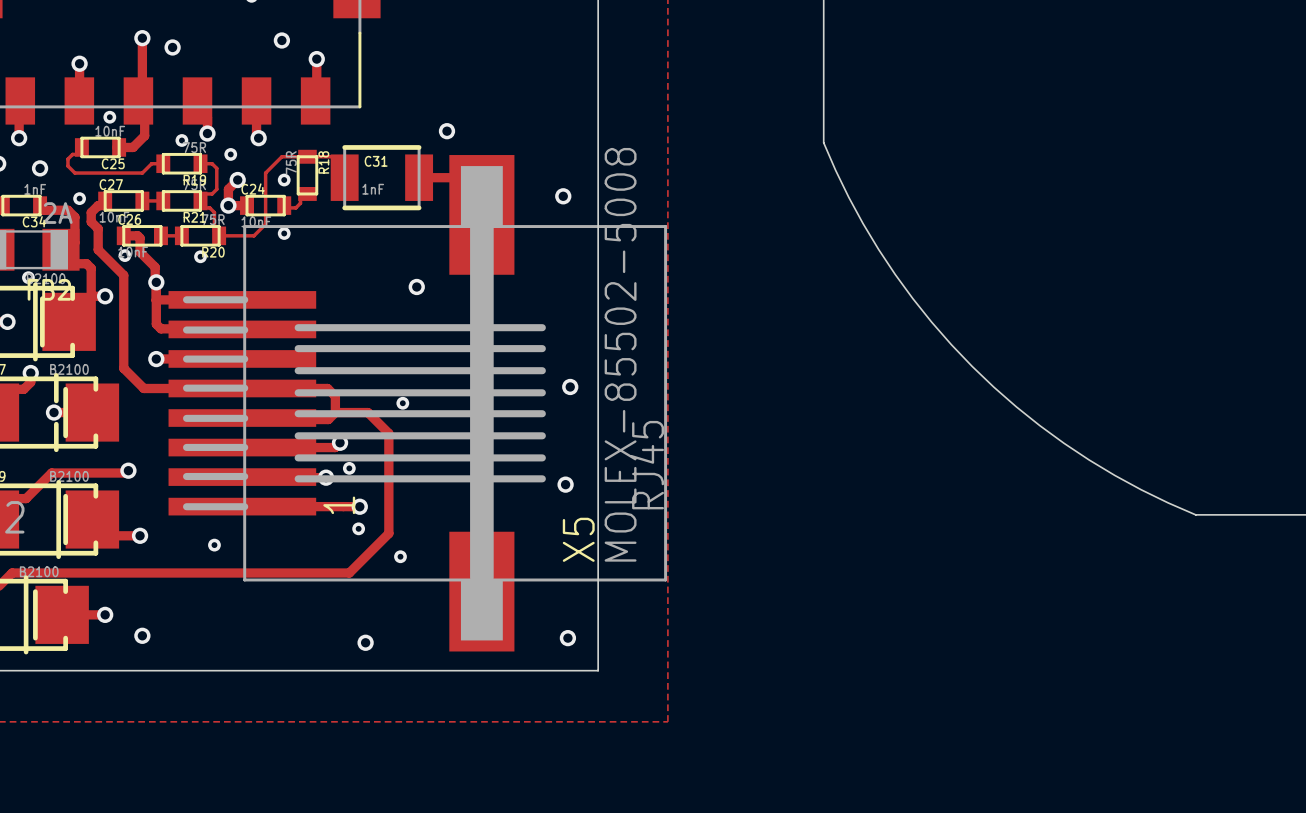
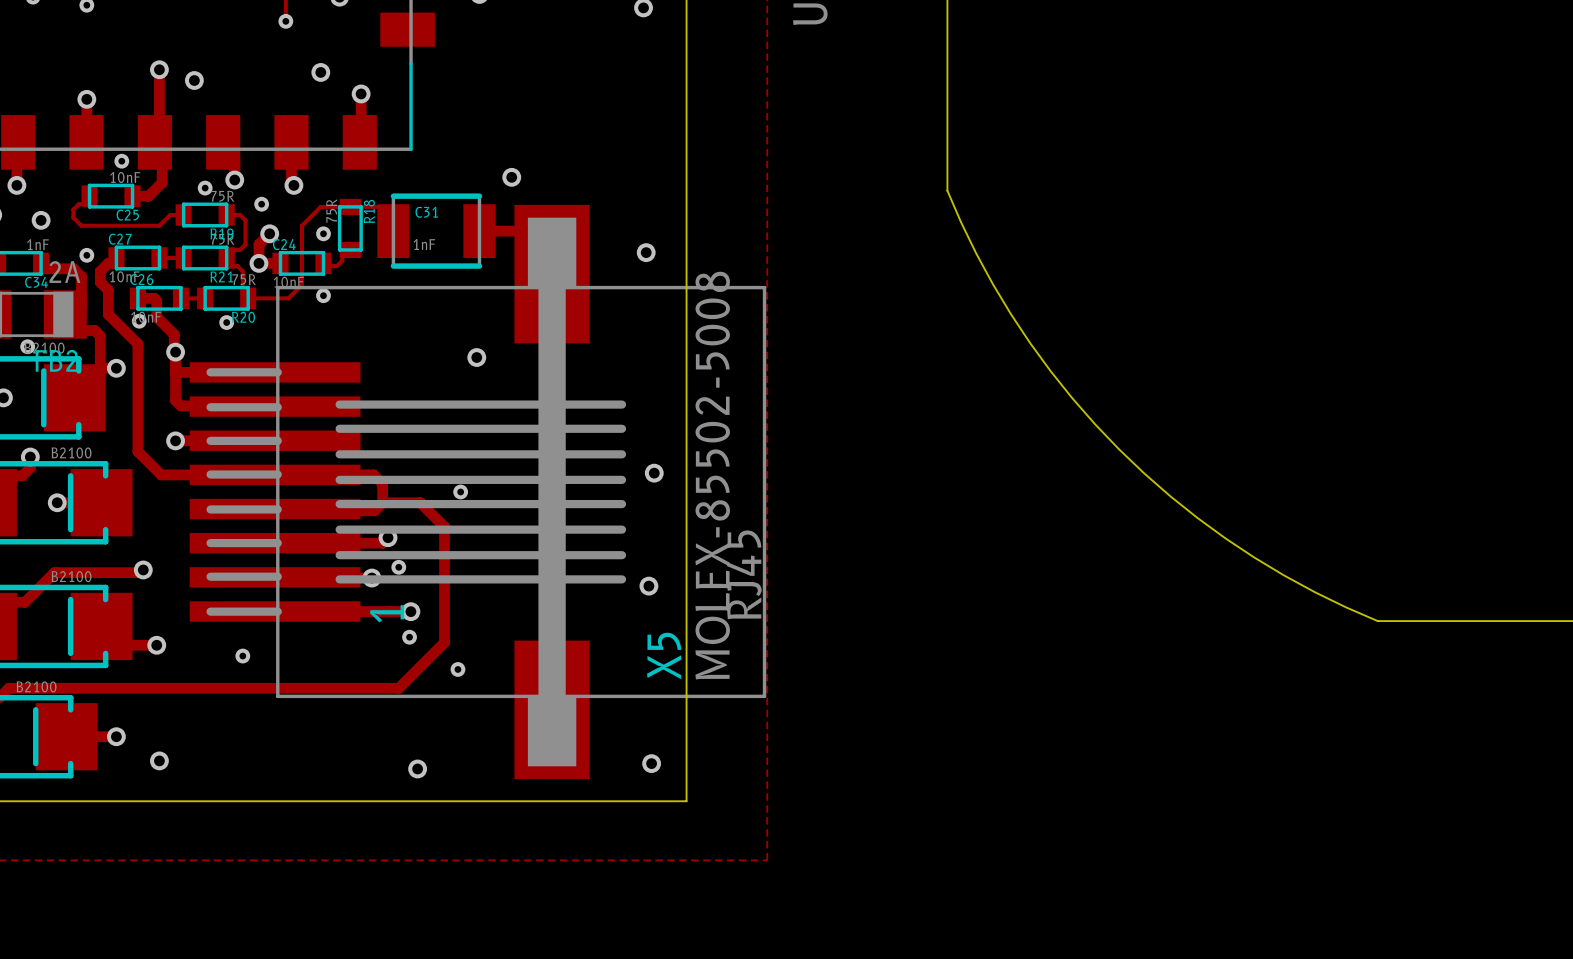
line: (35, 284) (35, 359) -> none
line: (56, 375) (56, 400) -> none
line: (56, 424) (56, 449) -> none
line: (58, 482) (58, 556) -> none
line: (26, 577) (26, 652) -> none

